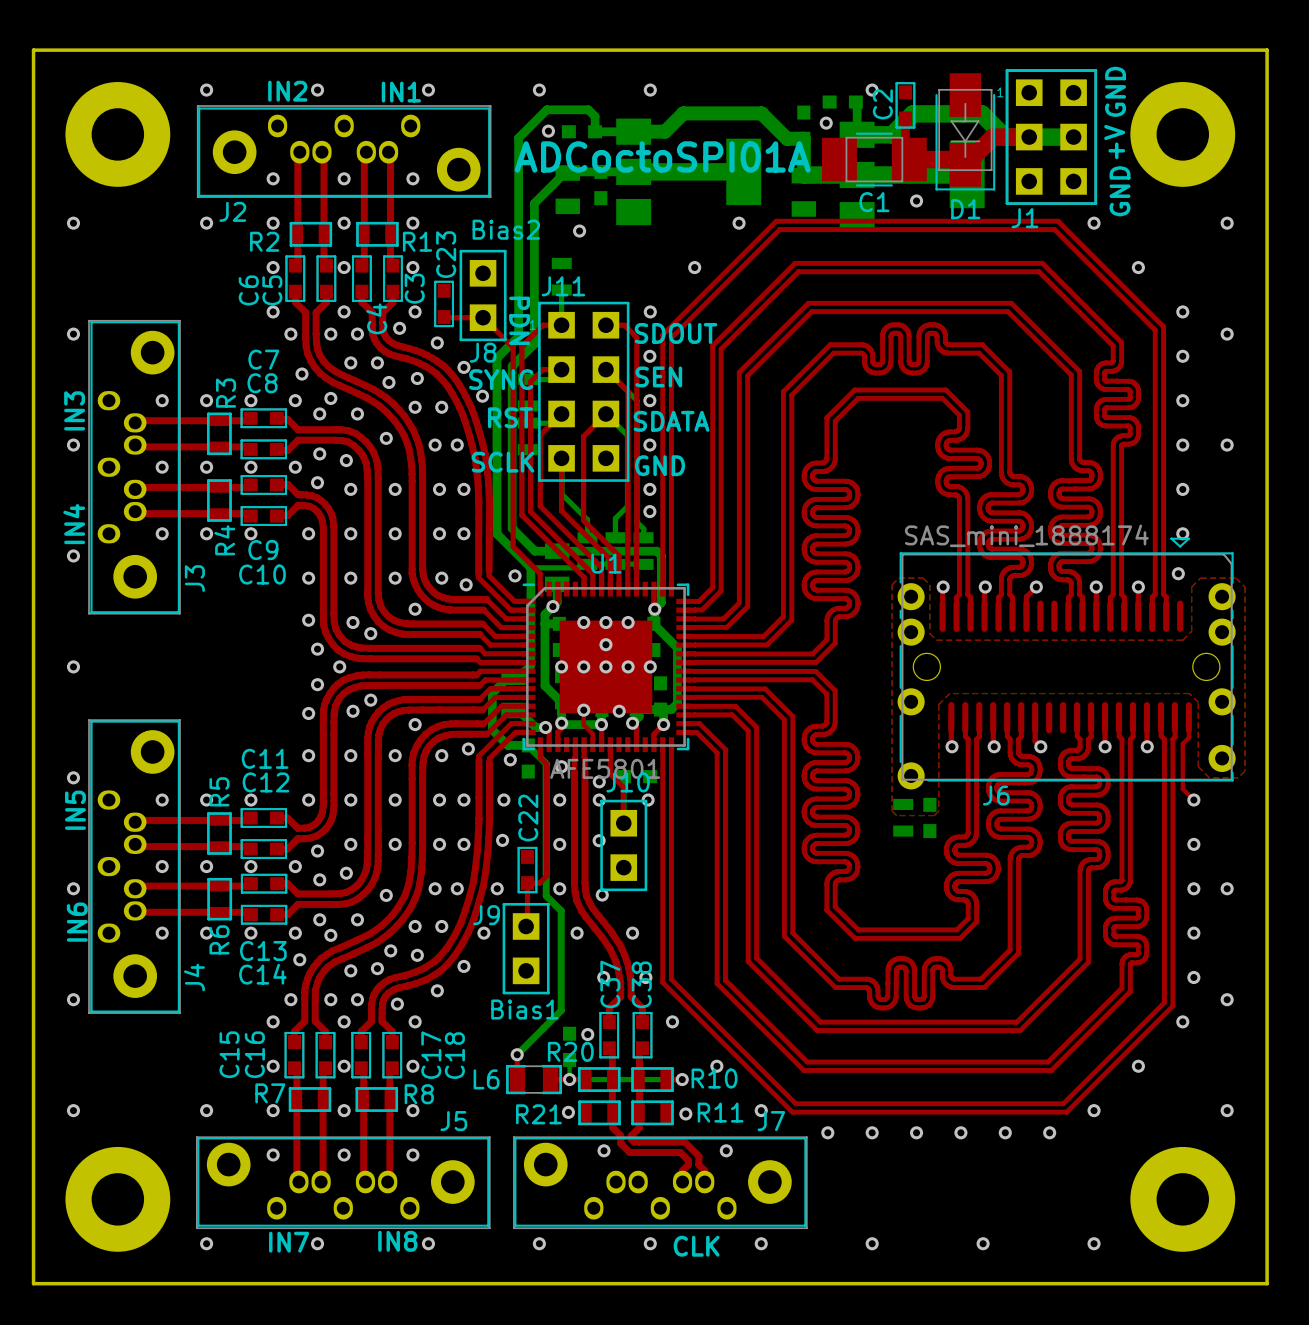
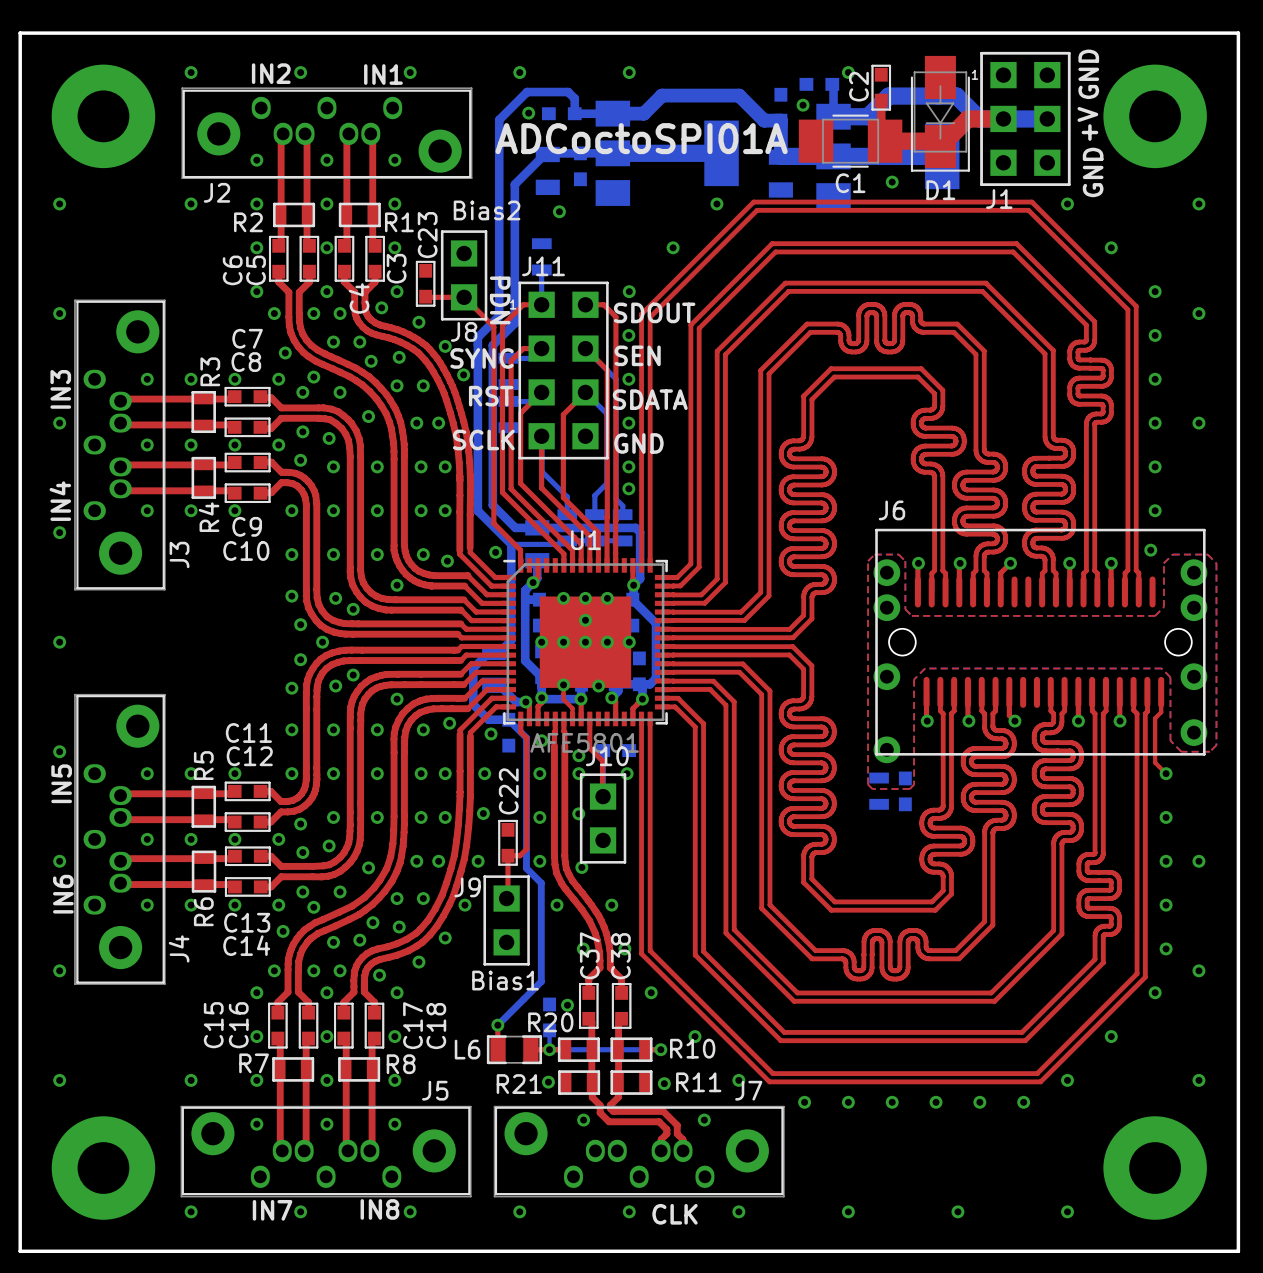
J6 value: SAS_mini_1888174 (1026, 535) -> none
J6 footprint: [897, 537, 1236, 790] -> [873, 528, 1208, 764]
J6 name position: J6 (996, 795) -> J6 (891, 510)

